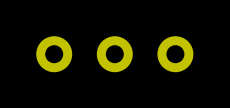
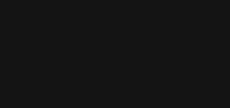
part: (54, 54) -> none
part: (114, 54) -> none
part: (175, 54) -> none

